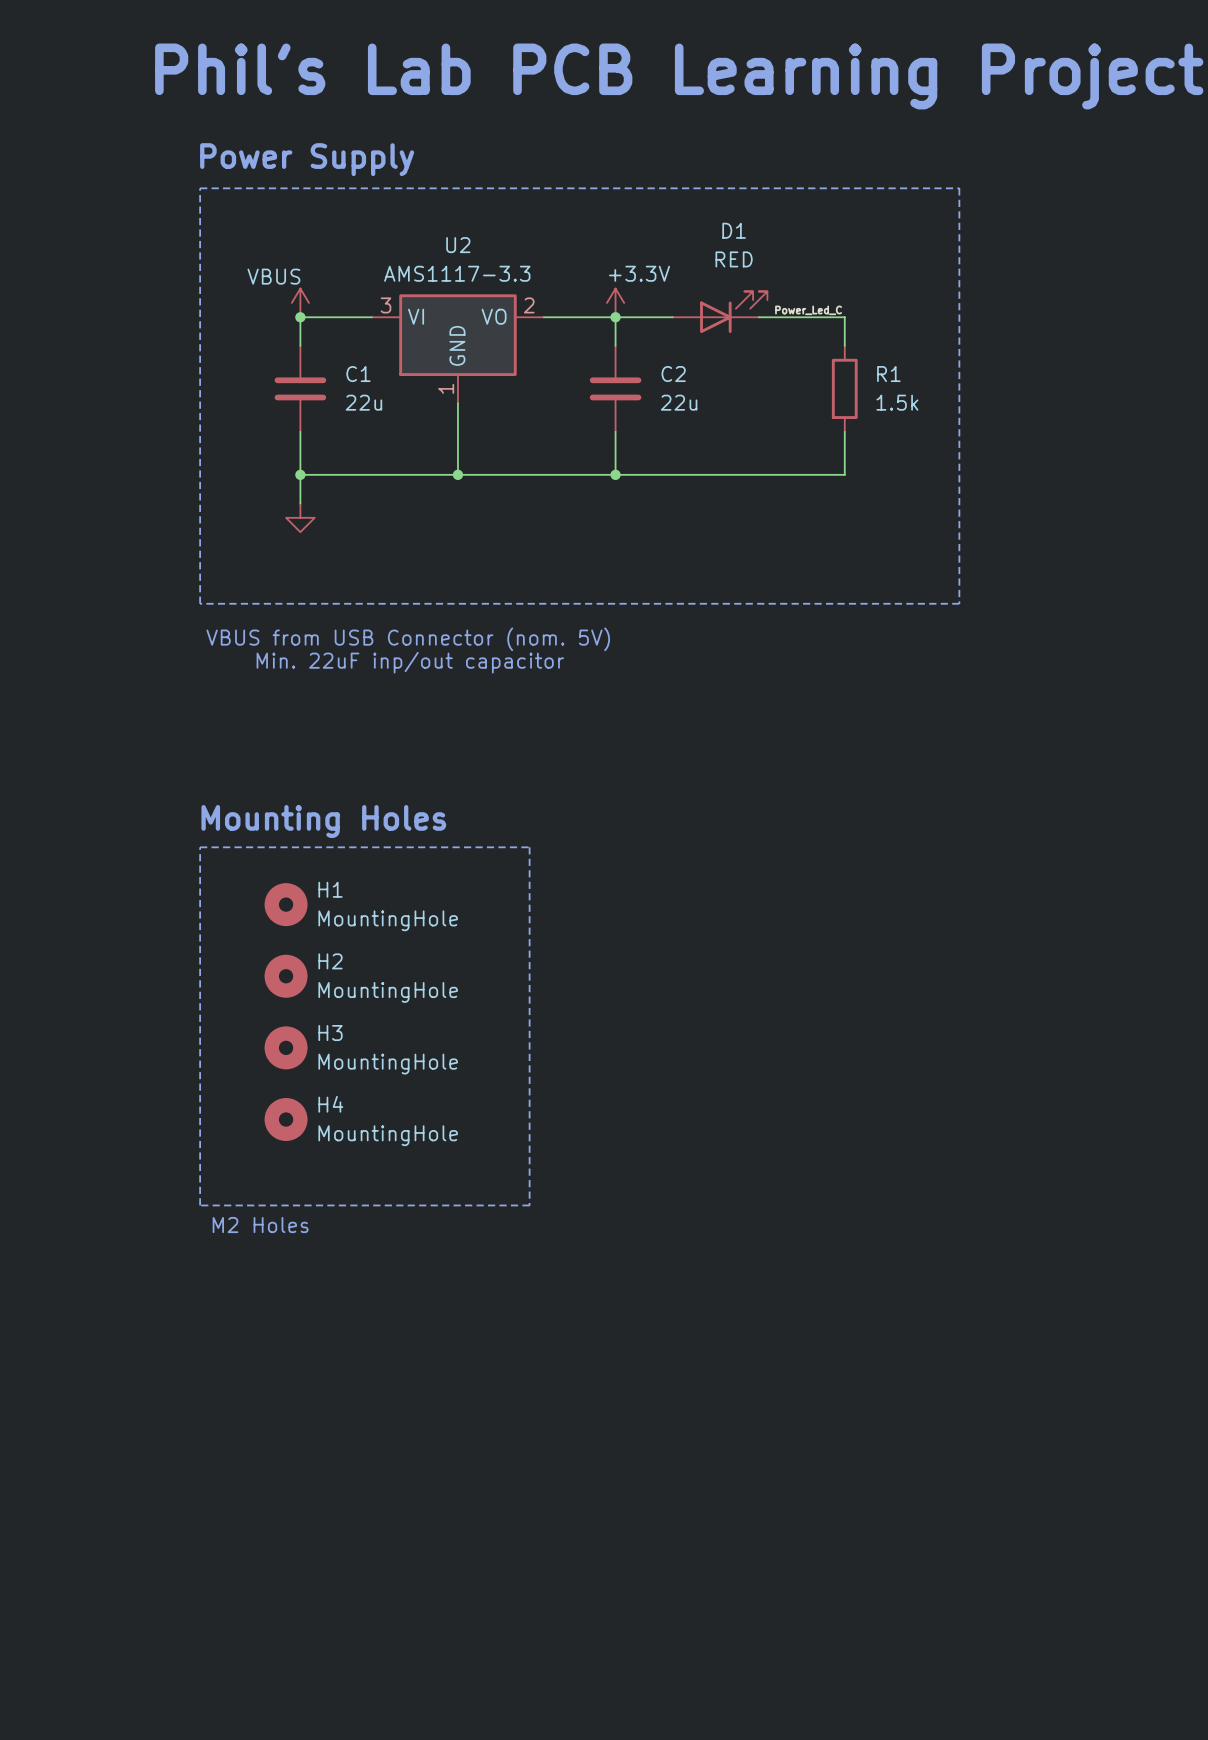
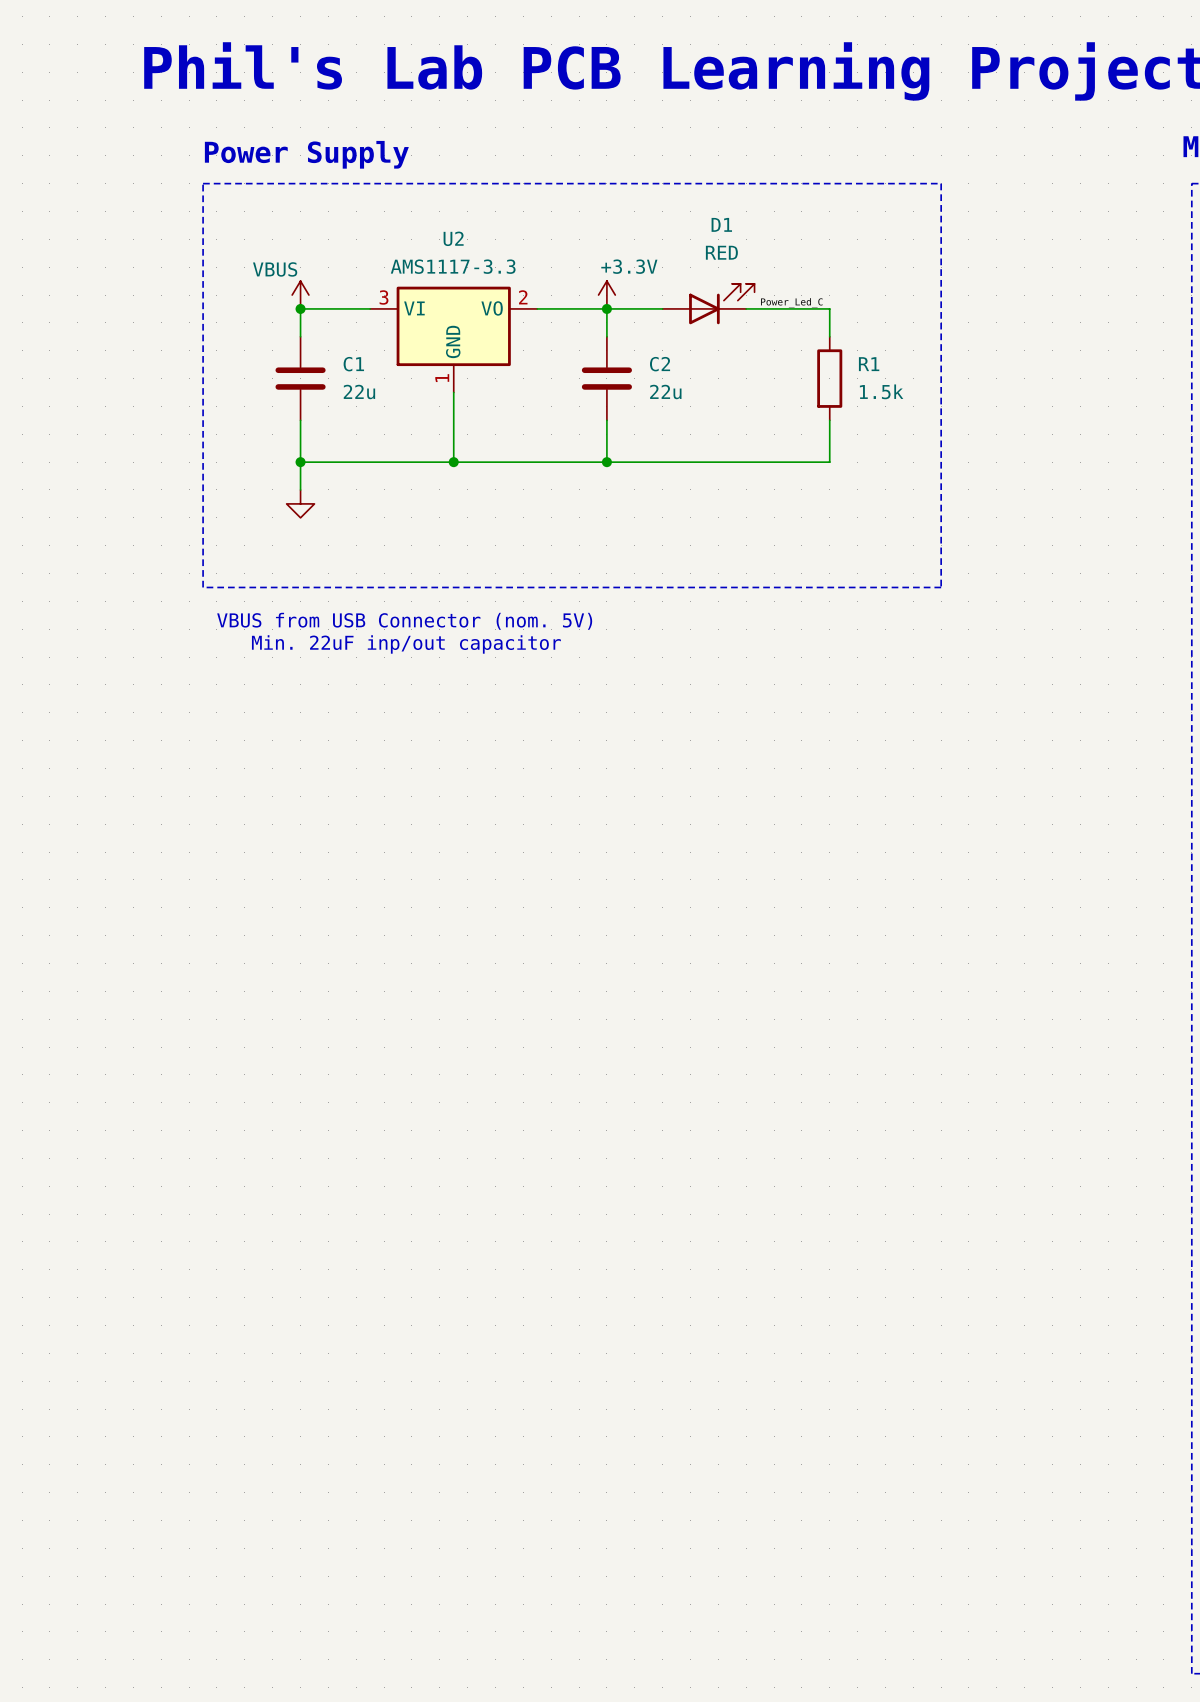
text: Mounting Holes (323, 821) -> none
line: (200, 847) (529, 847) (529, 1205) (200, 1205) (200, 847) -> none
H1: MountingHole (286, 904) -> none
H2: MountingHole (286, 976) -> none
H3: MountingHole (286, 1047) -> none
H4: MountingHole (286, 1119) -> none
text: M2 Holes (260, 1225) -> none

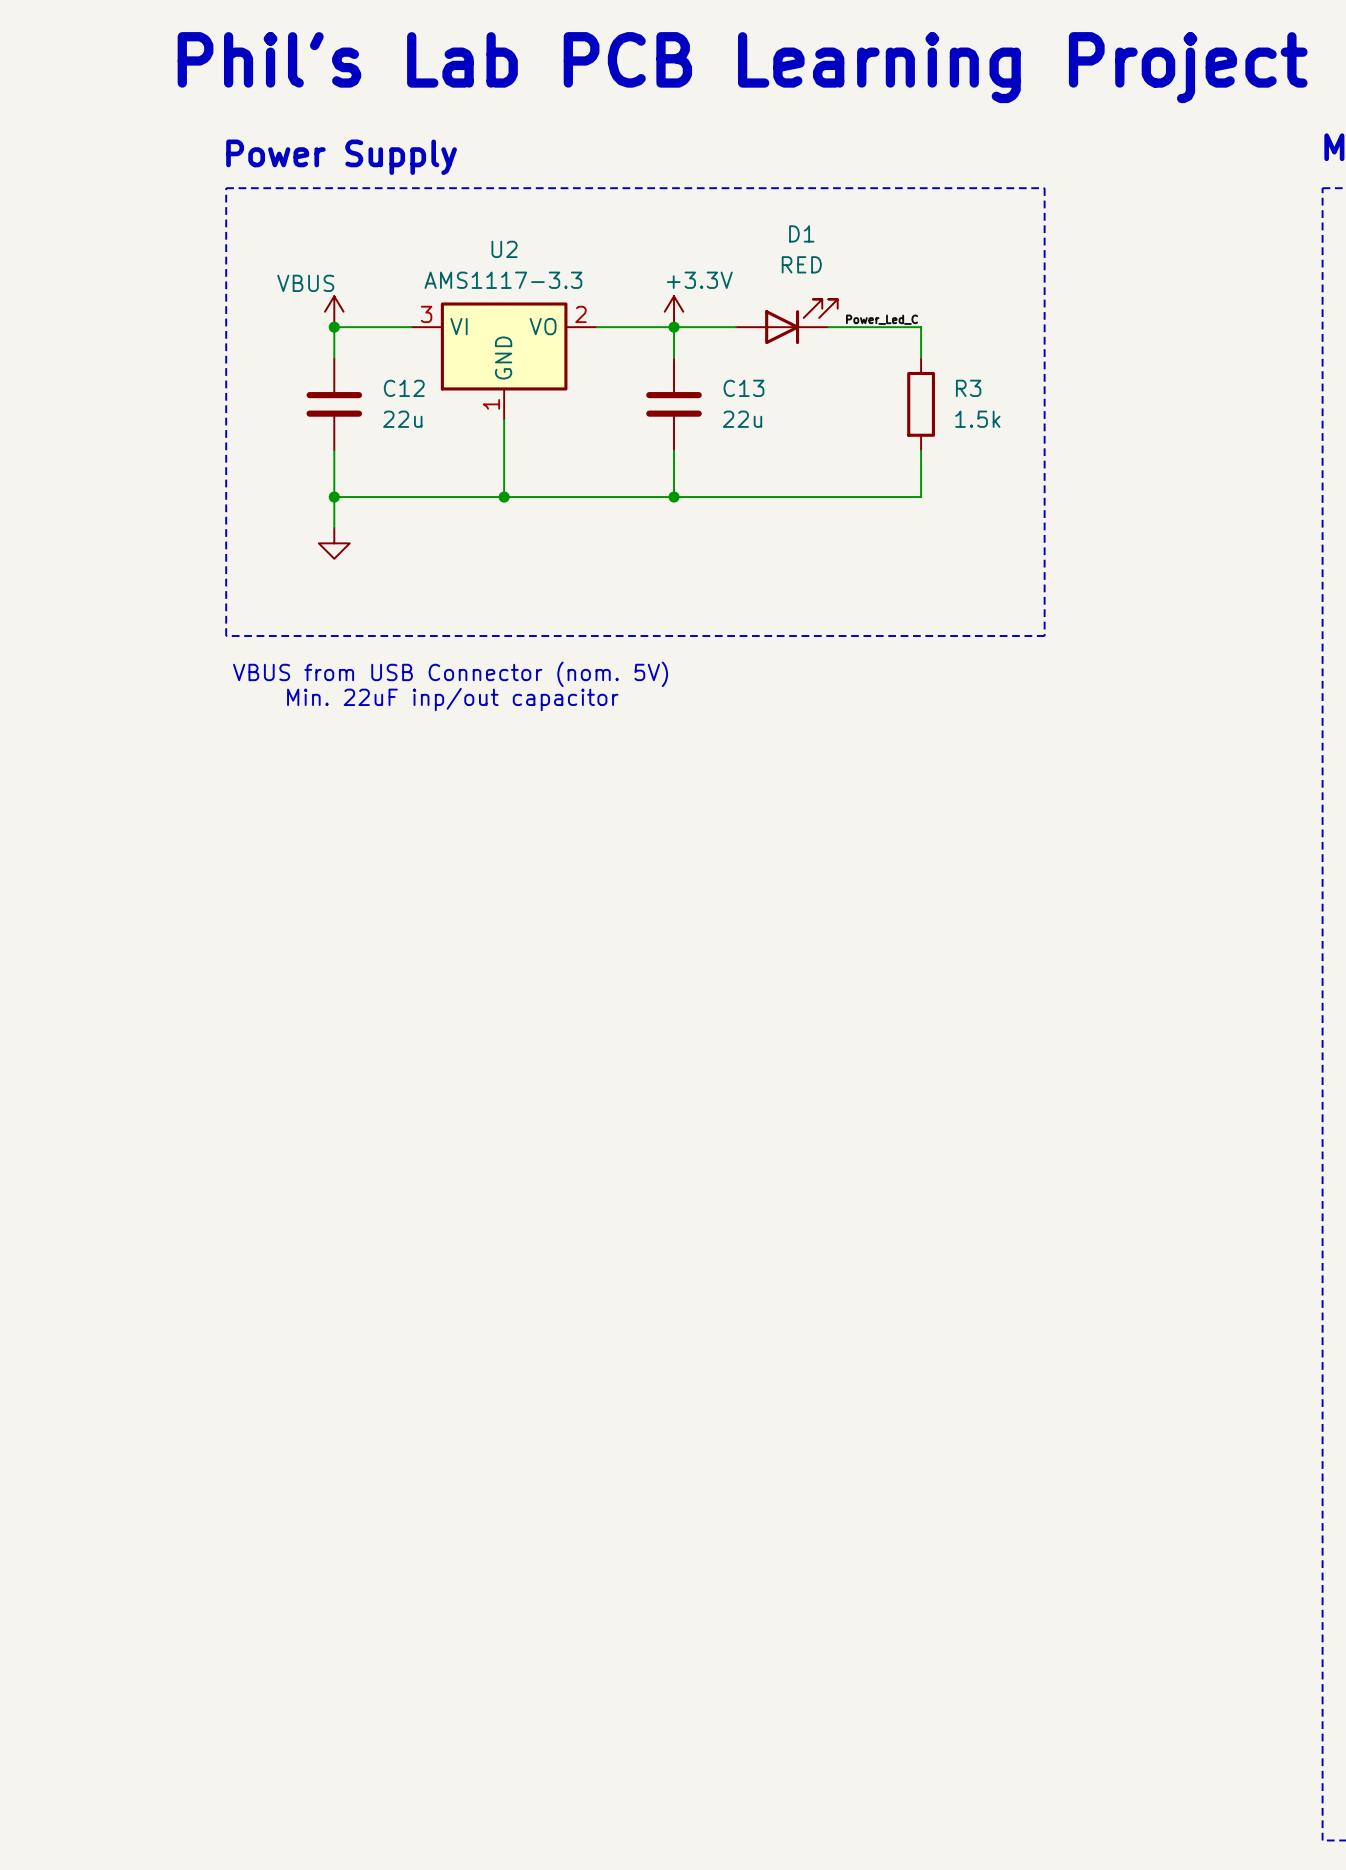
C1 name: C1 (353, 364) -> C12 (404, 388)
C2 name: C2 (660, 364) -> C13 (743, 388)
R1 name: R1 (869, 364) -> R3 (968, 388)

